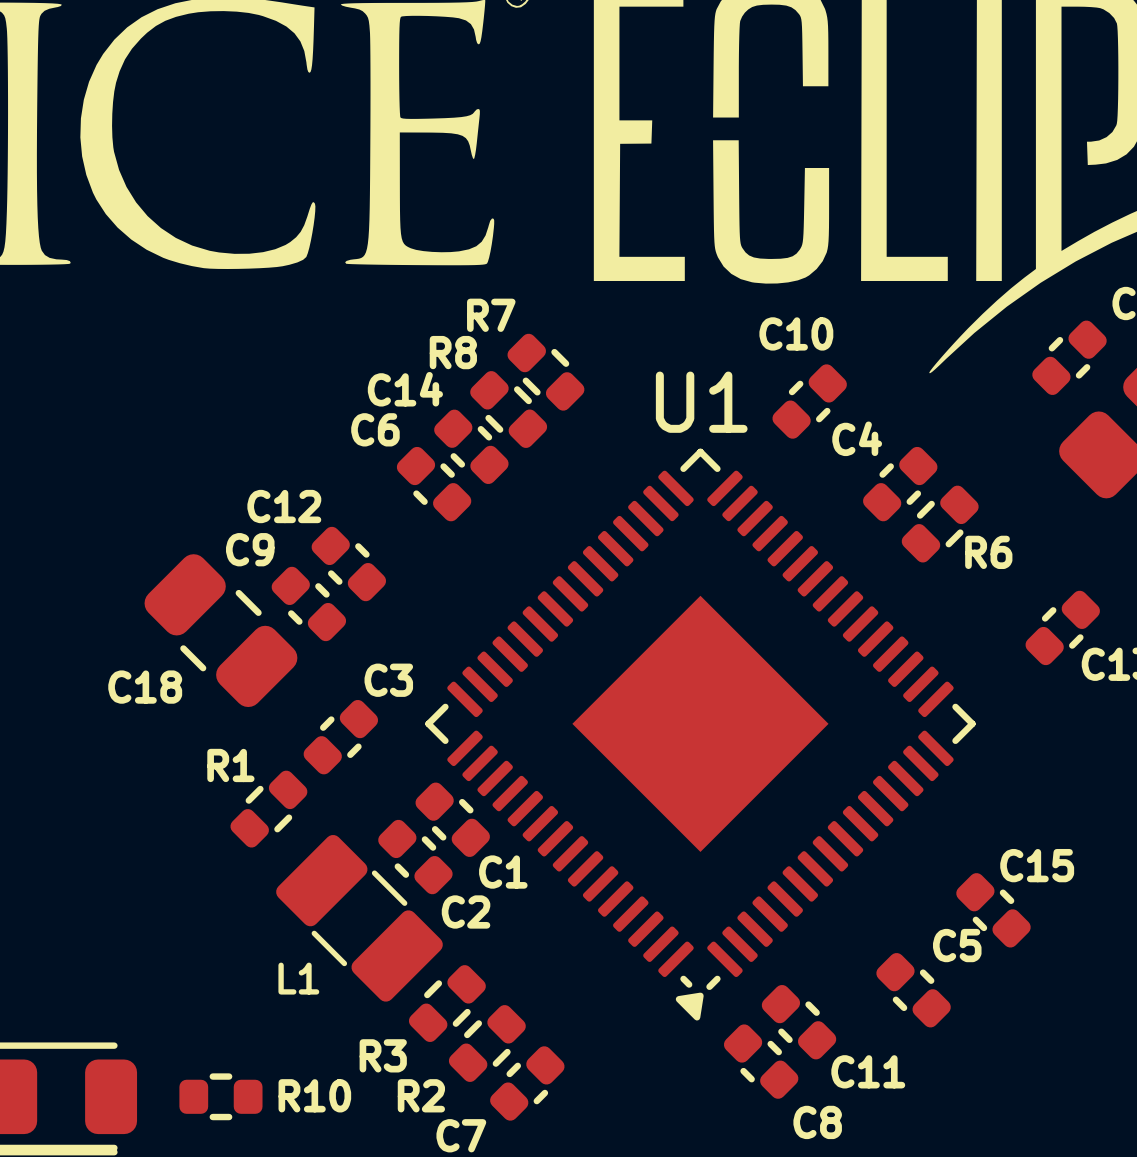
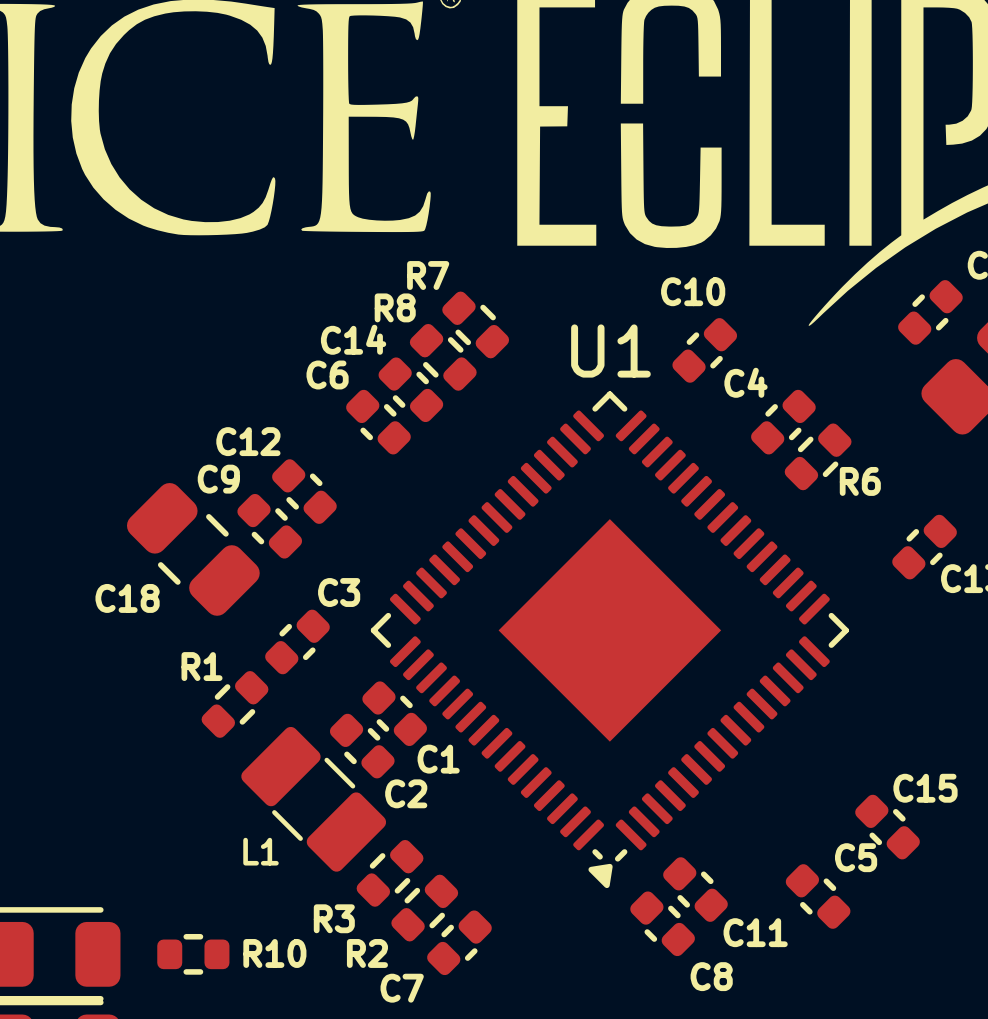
C15 position: (993, 910) -> (887, 827)
C5 position: (913, 990) -> (818, 896)

